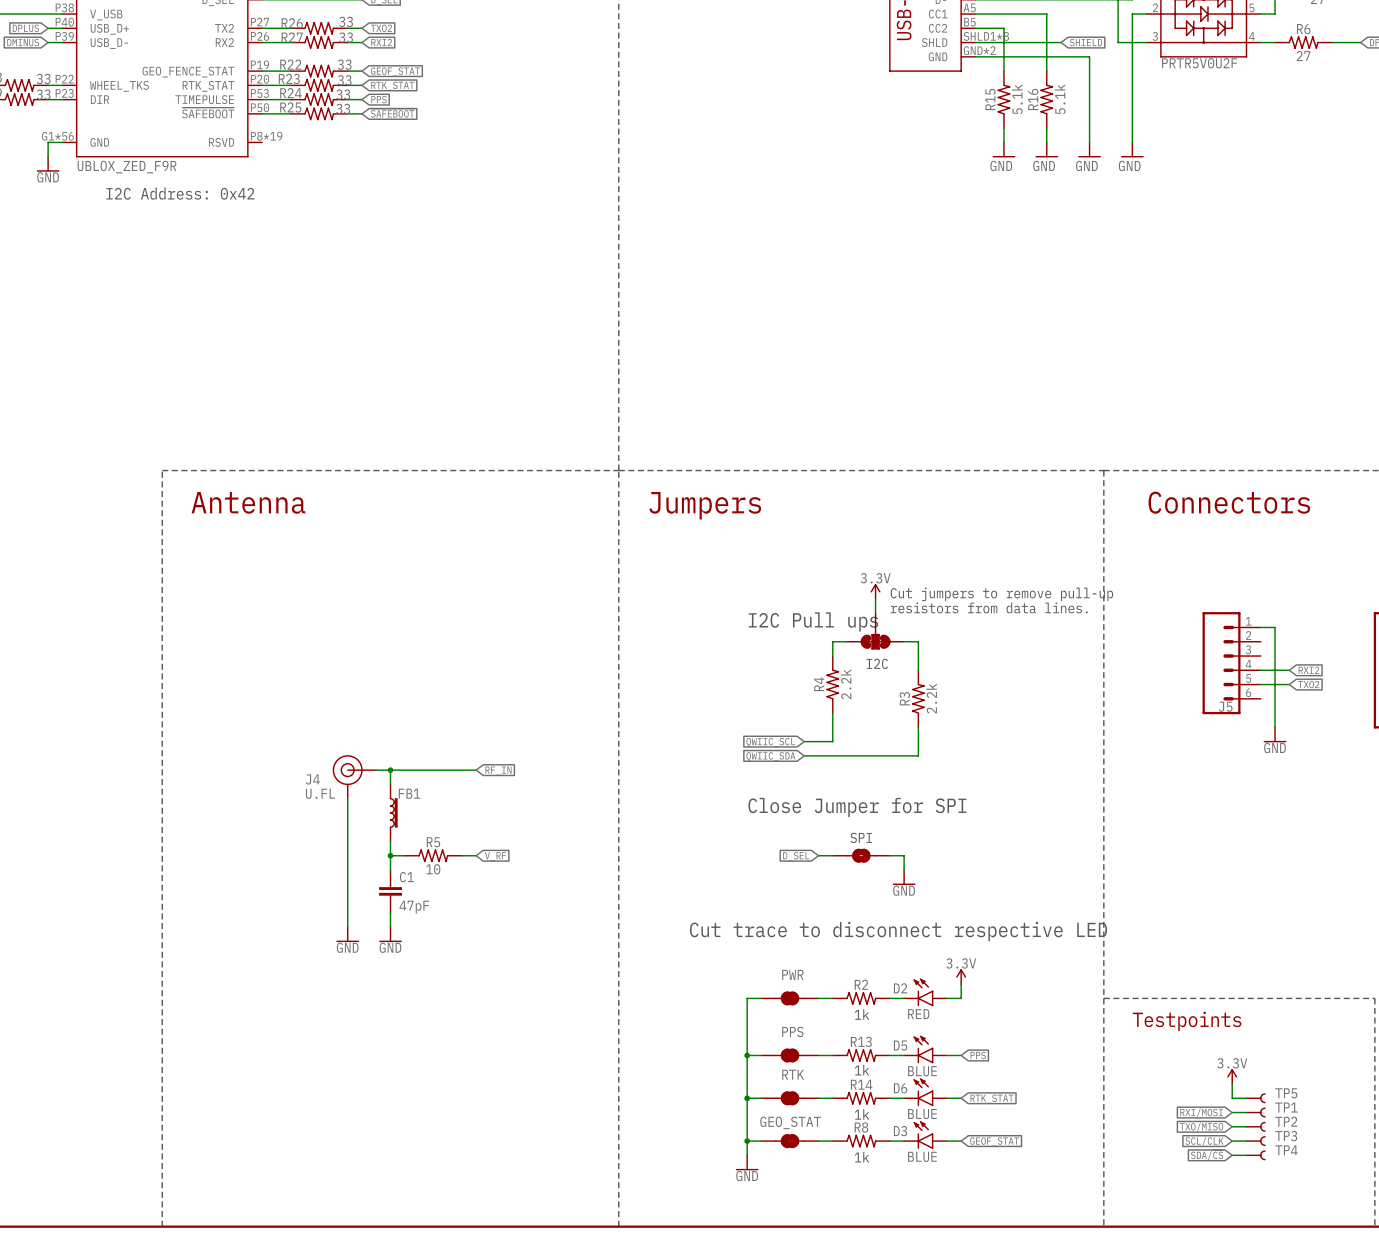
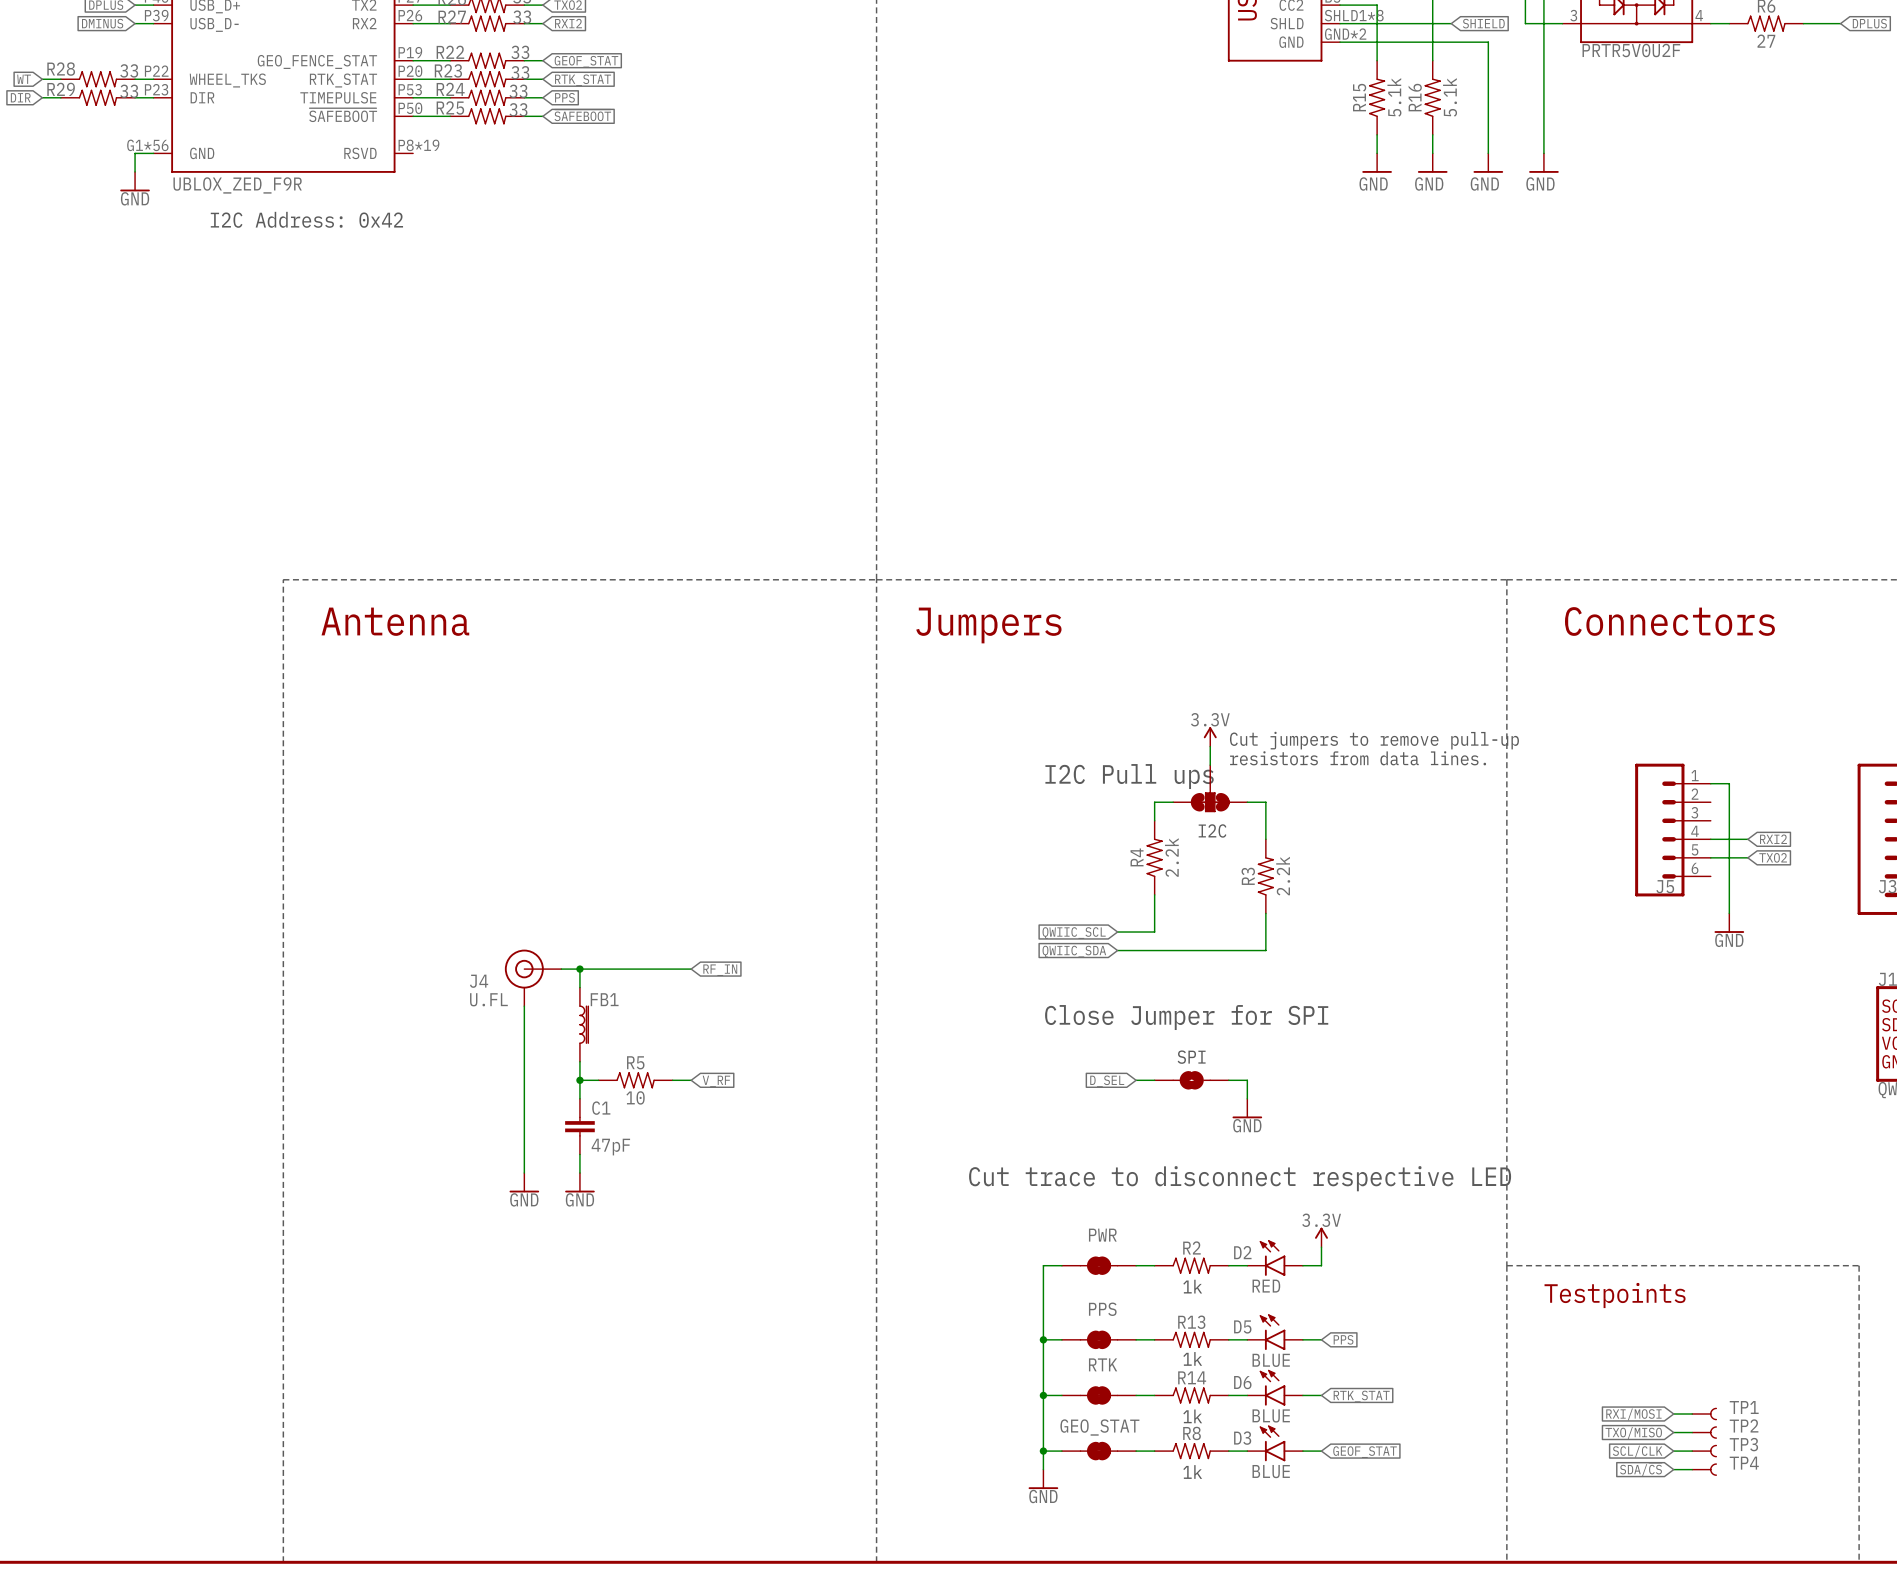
power symbol: 3.3V (1232, 1076) -> none
wire: (1232, 1084) (1232, 1098) (1246, 1098) -> none
TP5: (1255, 1098) -> none

